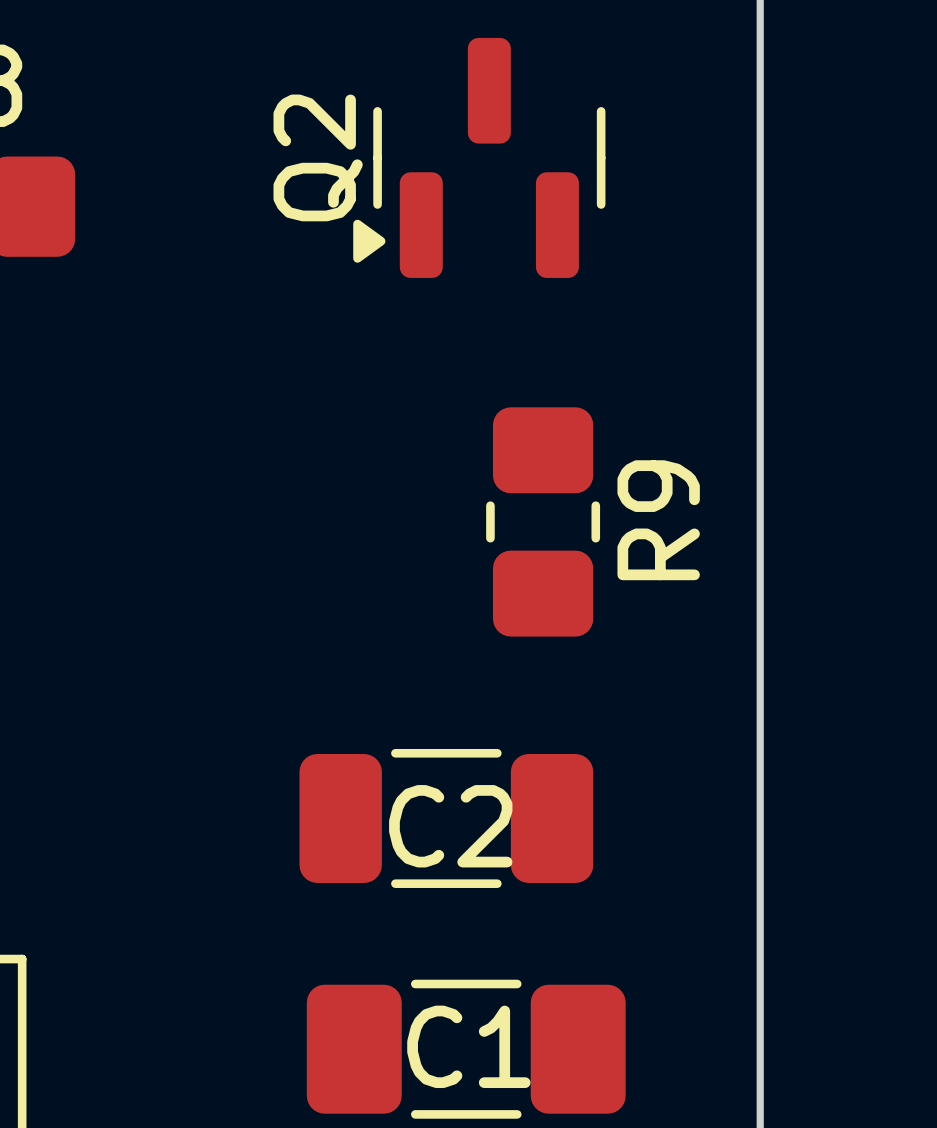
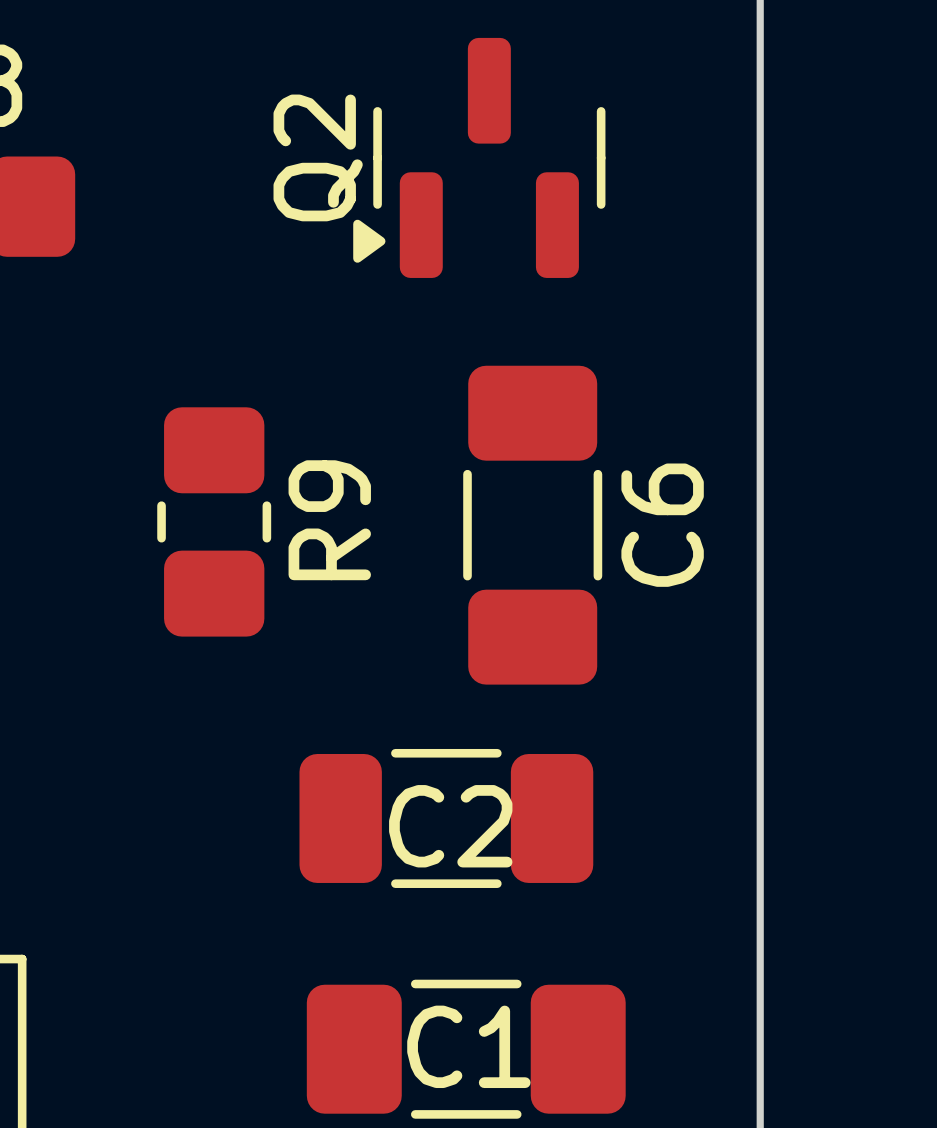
R9 position: (543, 521) -> (214, 521)
C6: none -> (532, 525)

